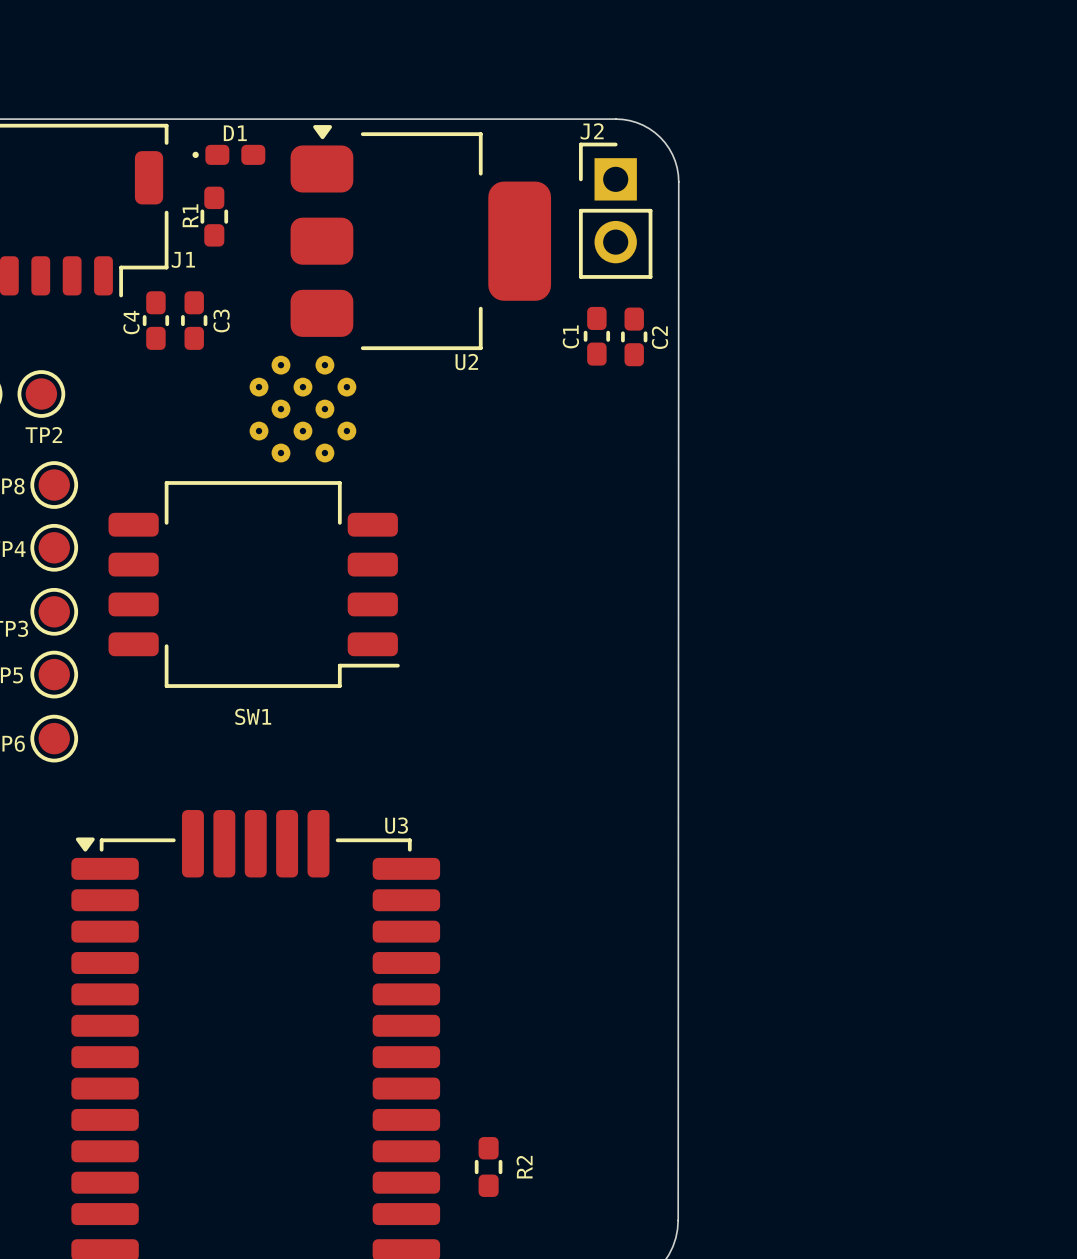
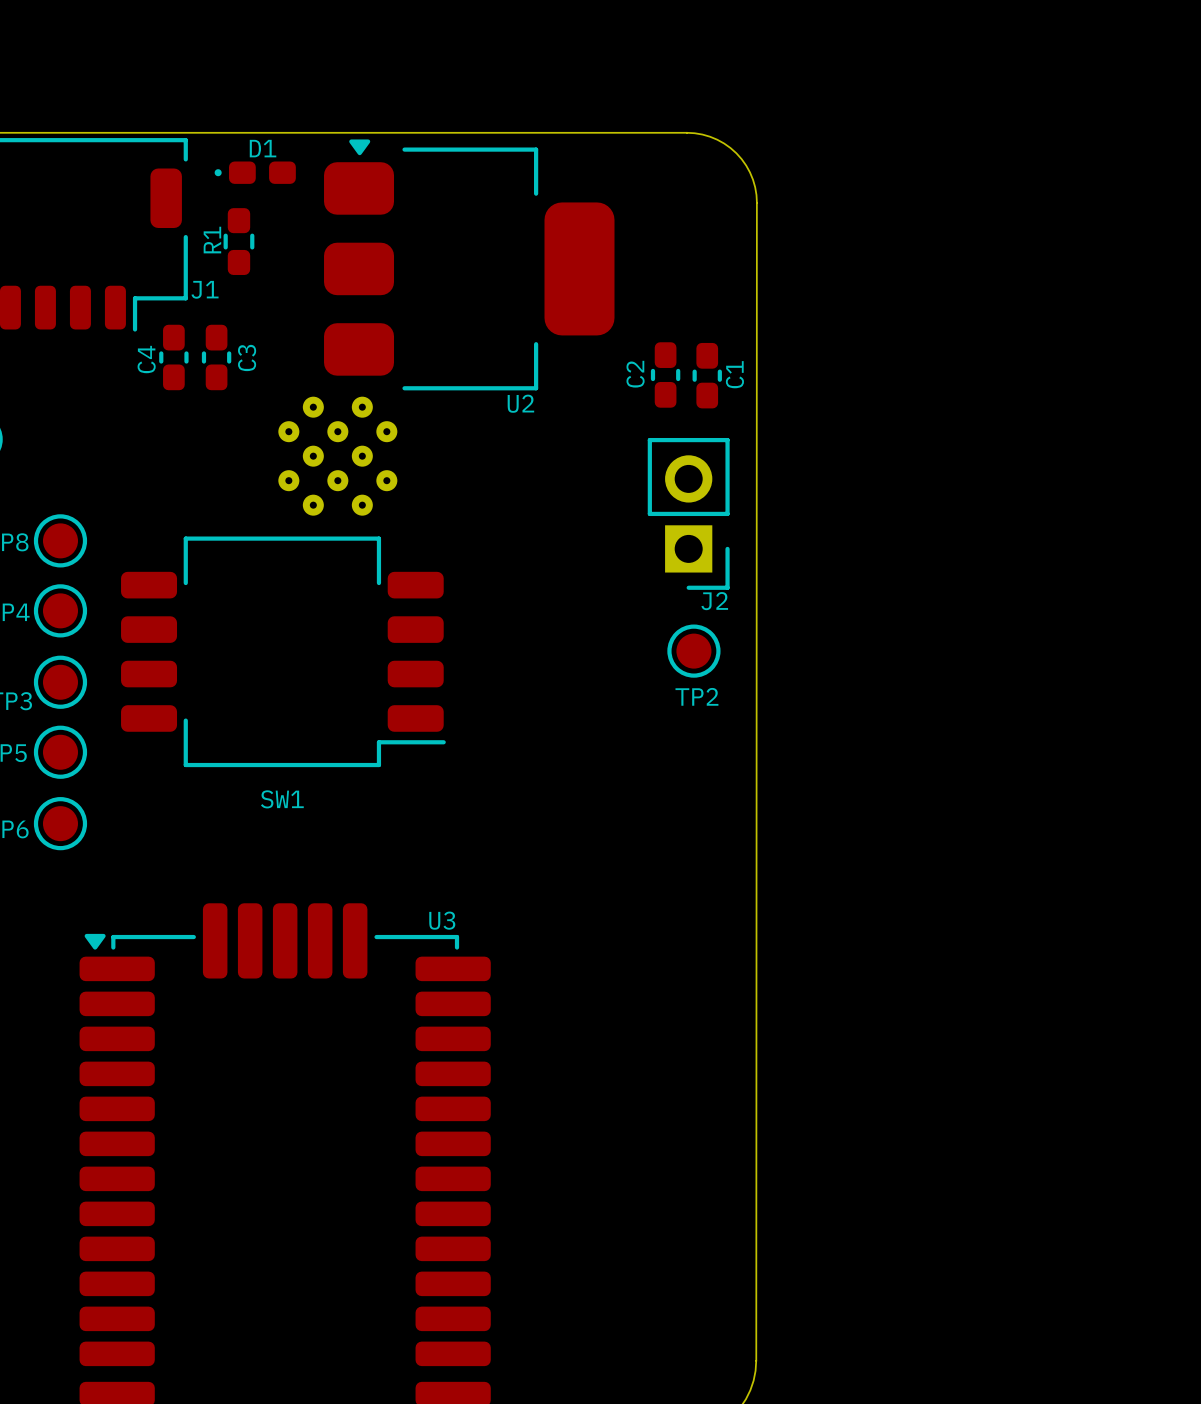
J2 rotation: 0° (615, 210) -> 180° (688, 513)
J2 position: (615, 210) -> (688, 513)
C1 name: C1 (570, 336) -> C2 (635, 374)
C2 name: C2 (660, 337) -> C1 (734, 374)
TP2 position: (41, 394) -> (693, 651)
R2: (488, 1167) -> none

